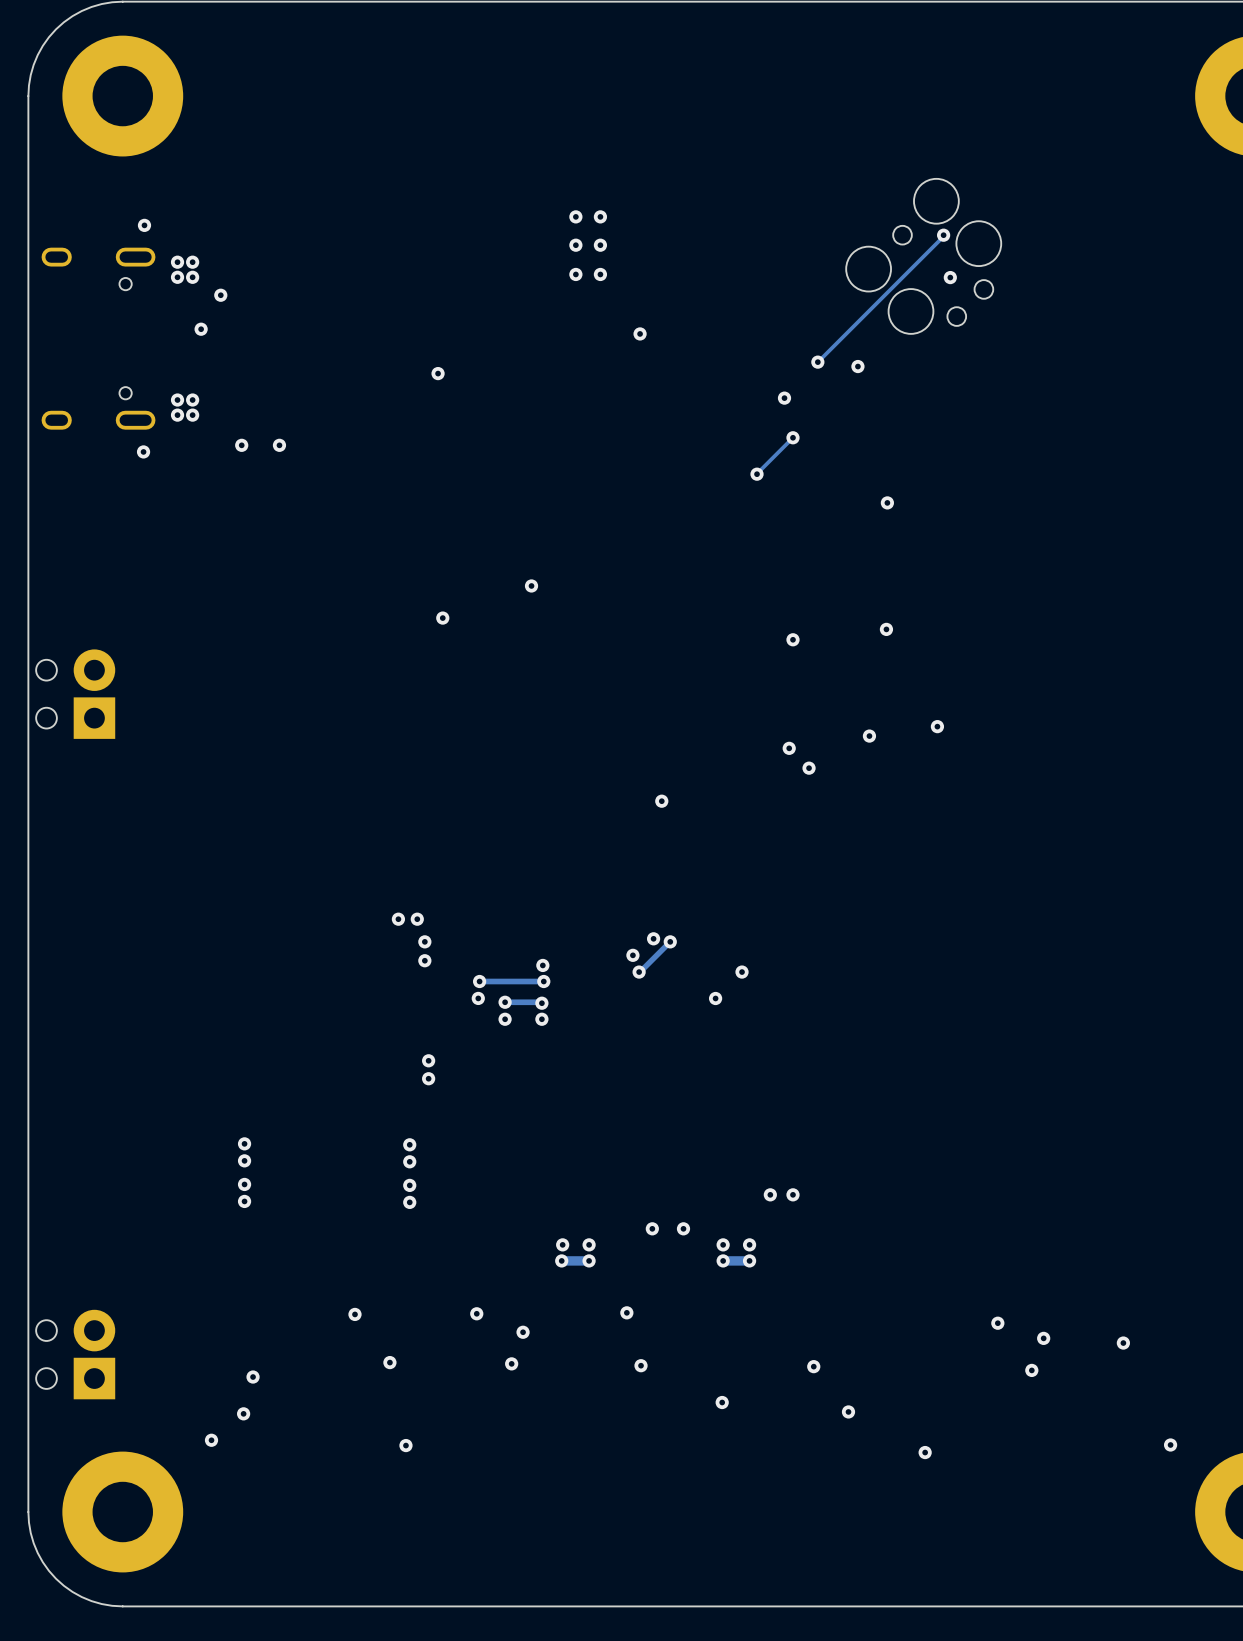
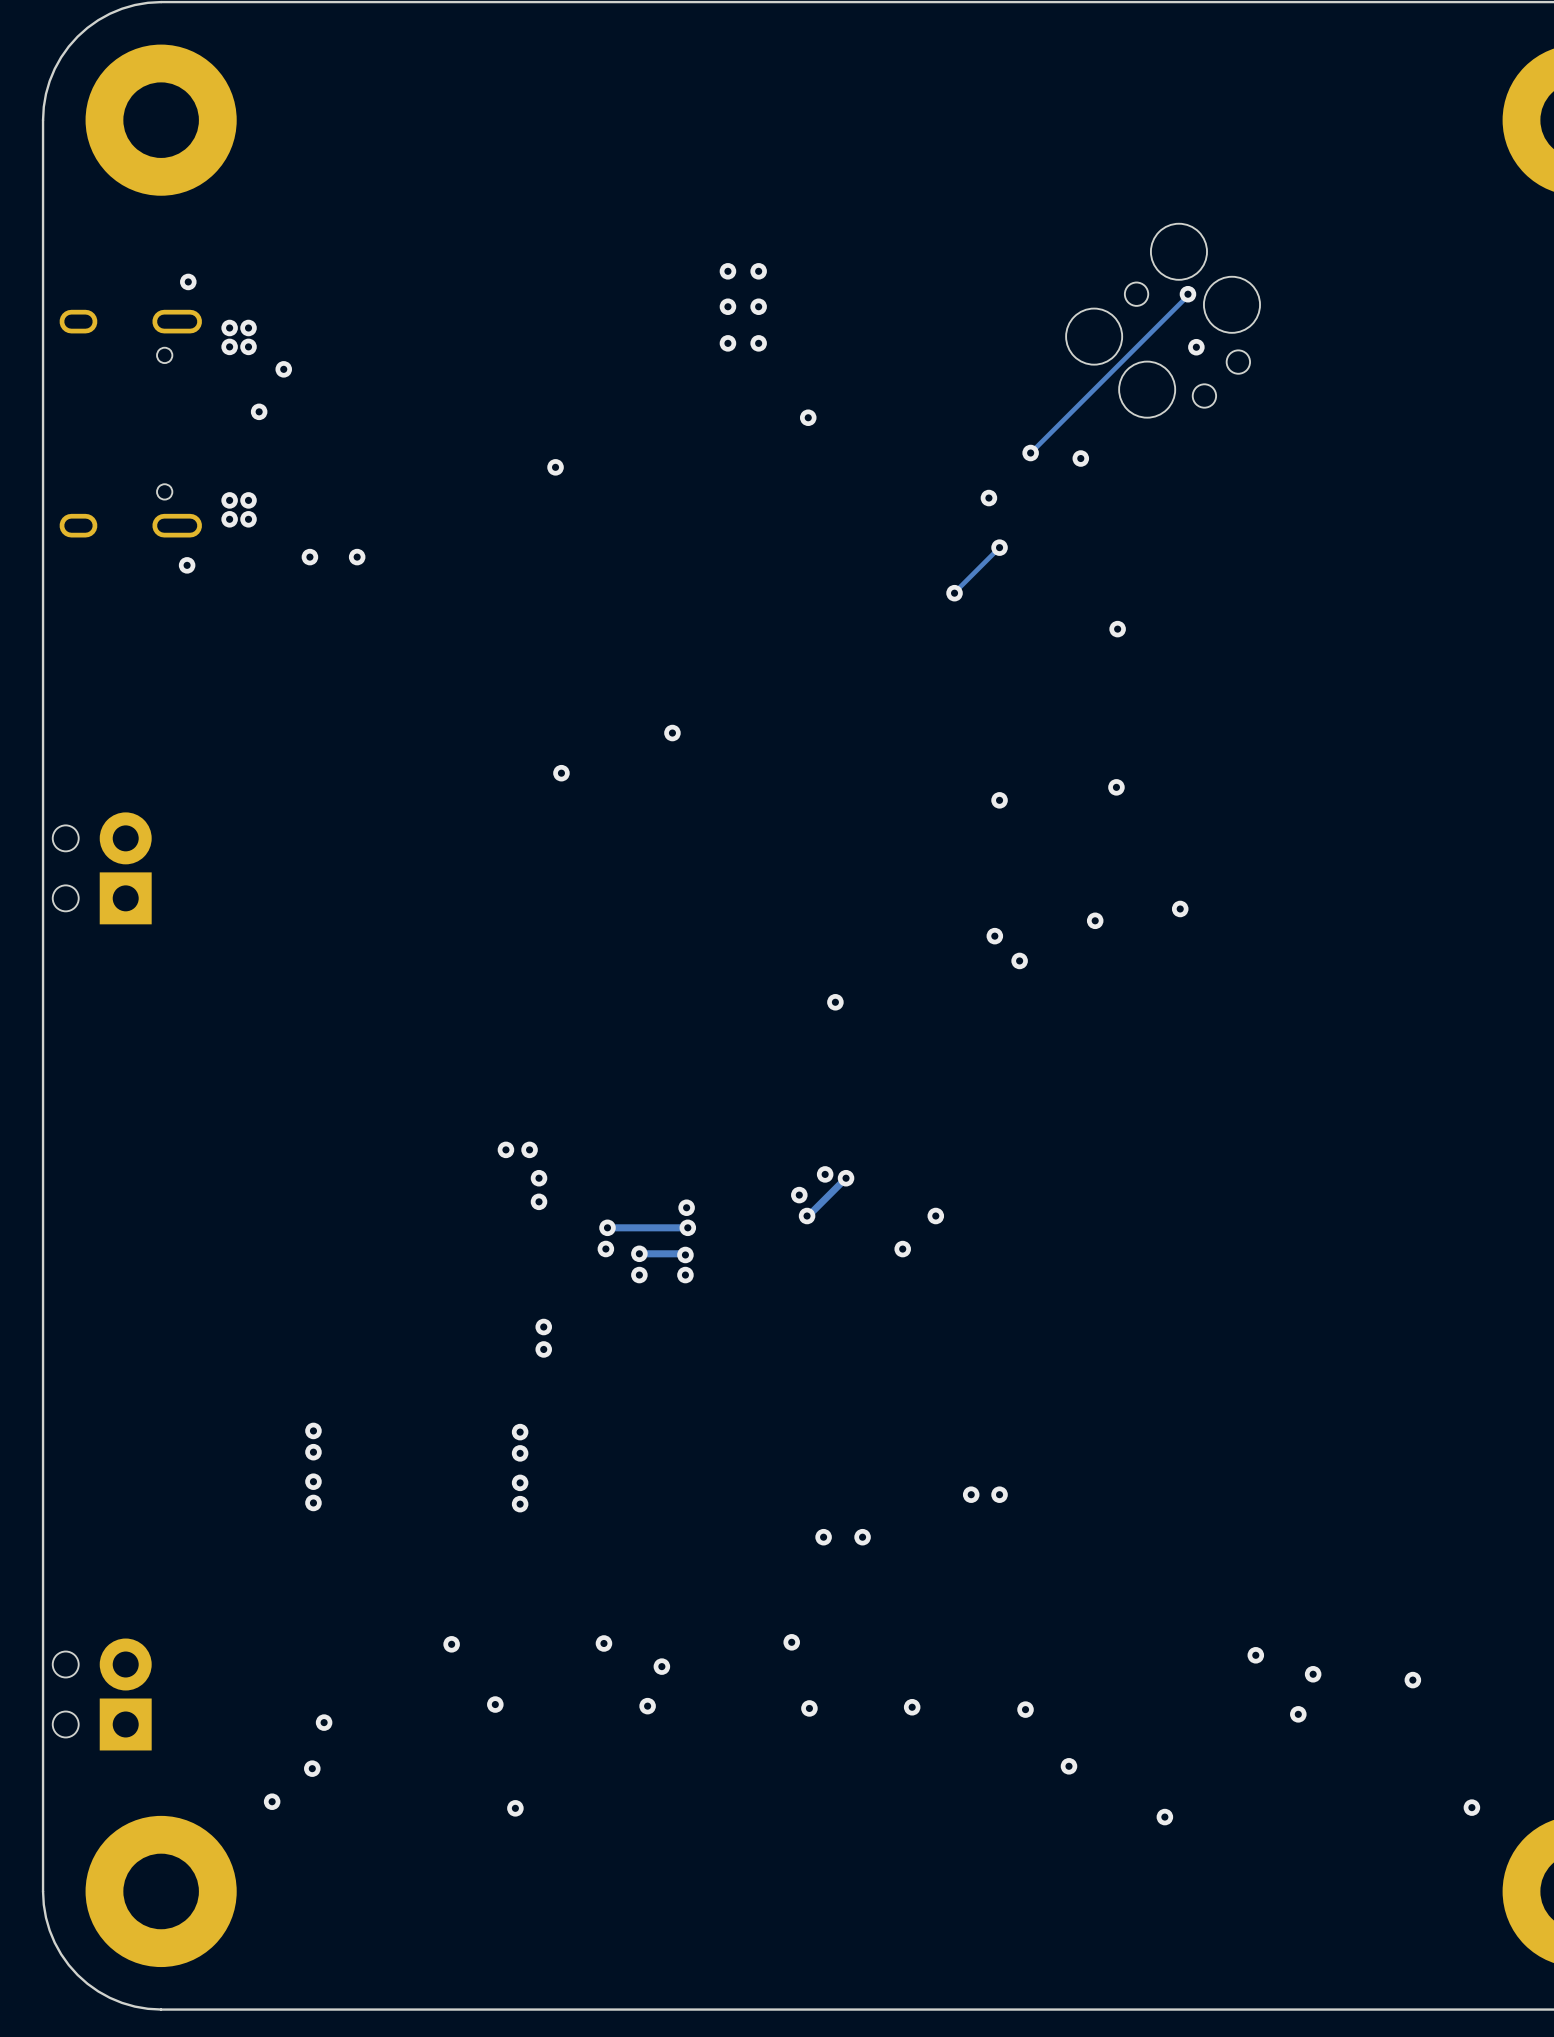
via: (562, 1244) -> none
via: (589, 1244) -> none
via: (723, 1244) -> none
via: (749, 1244) -> none
via: (561, 1260) -> none
track: (589, 1260) (561, 1260) -> none
via: (589, 1260) -> none
via: (723, 1260) -> none
track: (749, 1260) (723, 1260) -> none
via: (749, 1260) -> none
via position: (722, 1402) -> (912, 1707)

